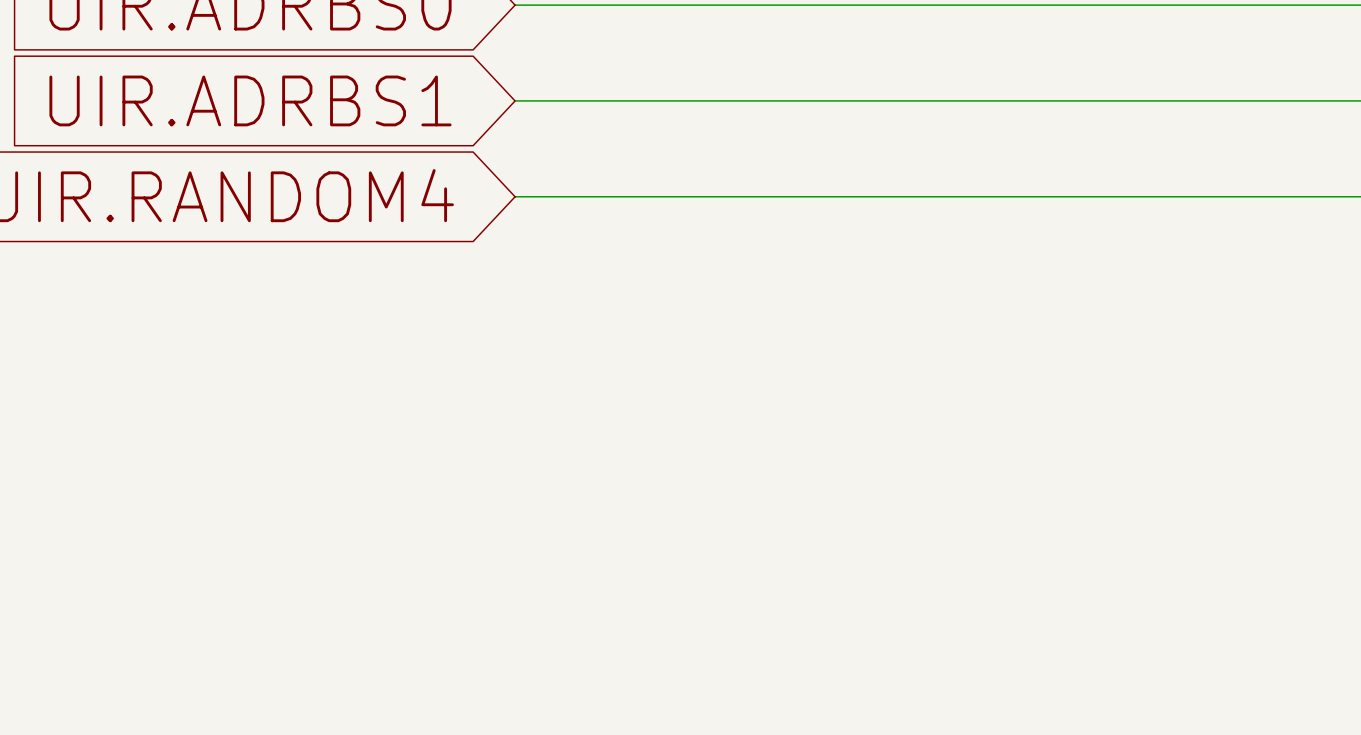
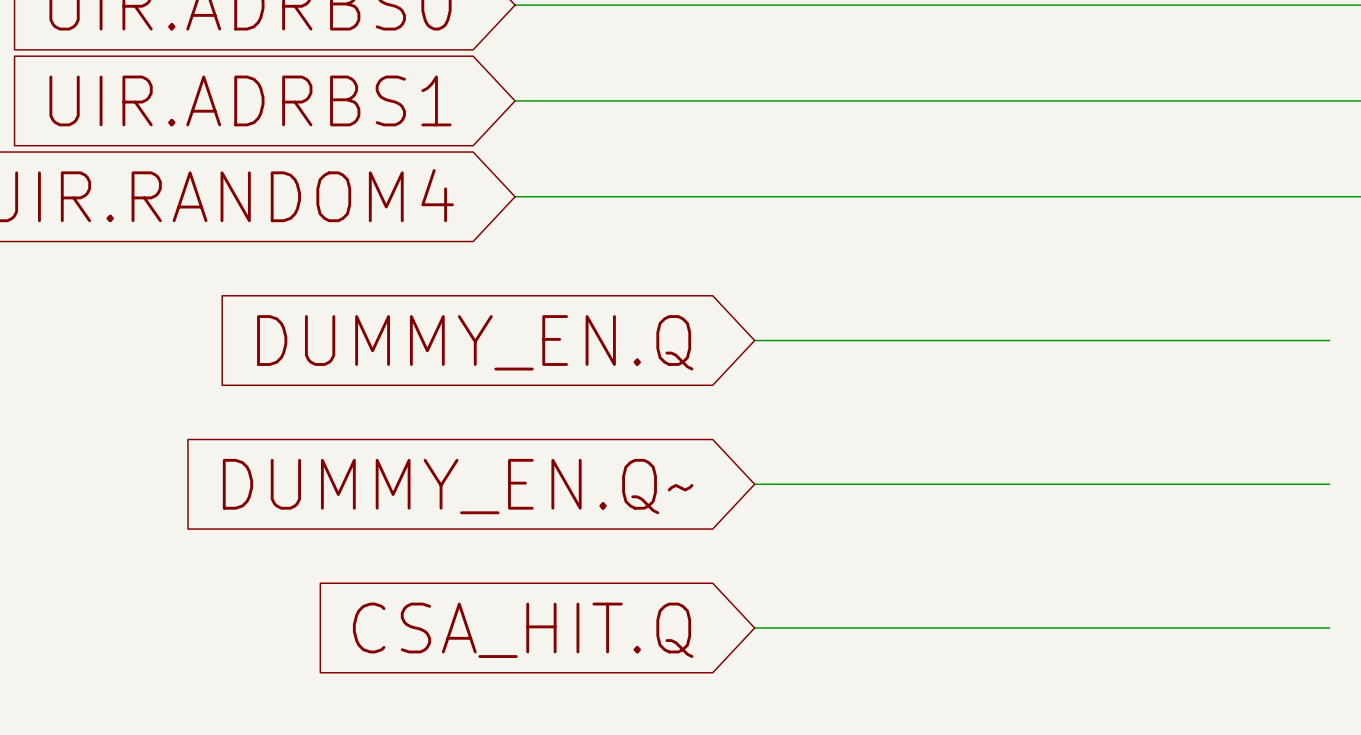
wire: none -> (754, 340) (1329, 340)
global label: none -> DUMMY_EN.Q (475, 342)
wire: none -> (754, 484) (1329, 484)
global label: none -> DUMMY_EN.Q~ (458, 486)
wire: none -> (754, 628) (1329, 628)
global label: none -> CSA_HIT.Q (523, 630)

